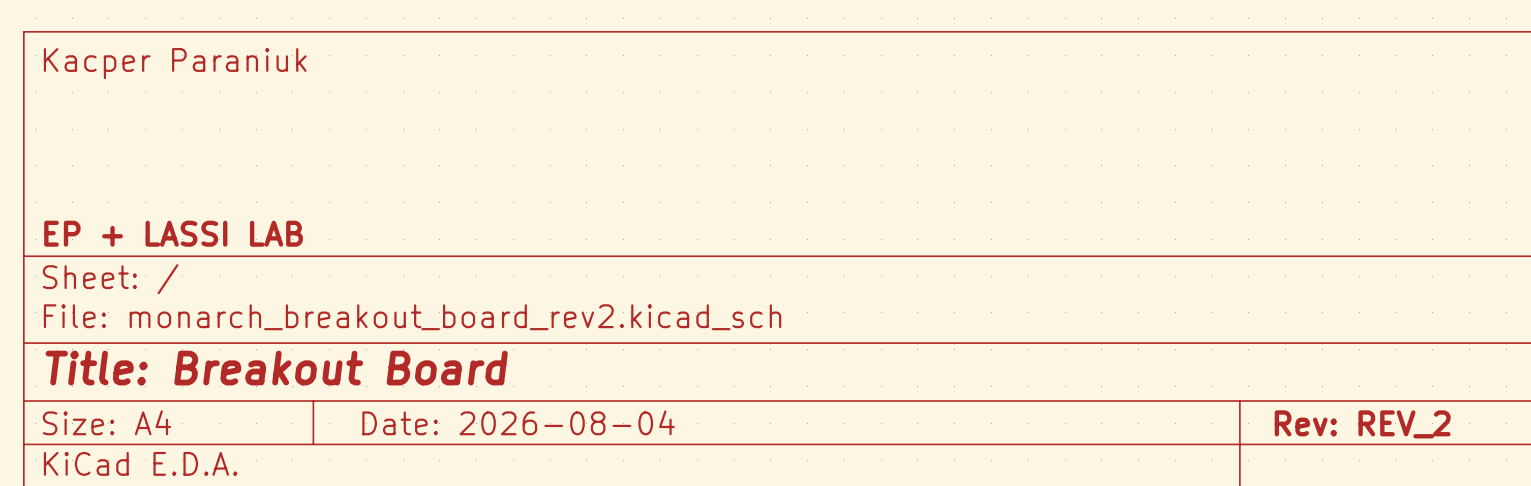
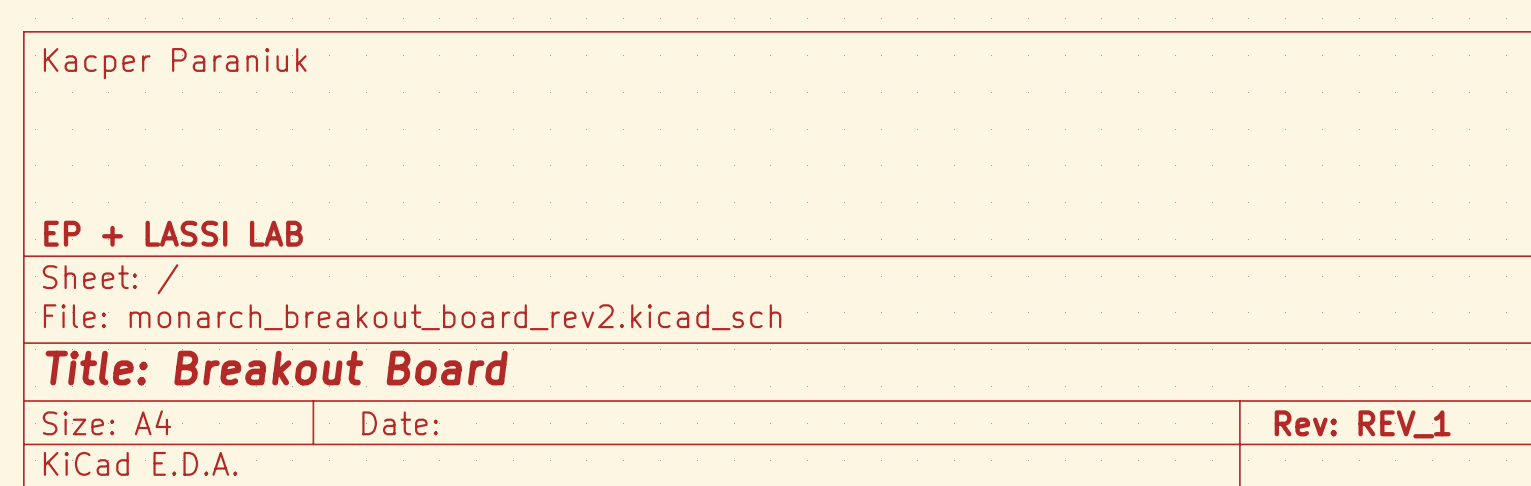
title block: Date: 2026-08-04 (518, 422) -> Date: (400, 423)
title block: Rev: REV_2 (1362, 424) -> Rev: REV_1 (1362, 424)

